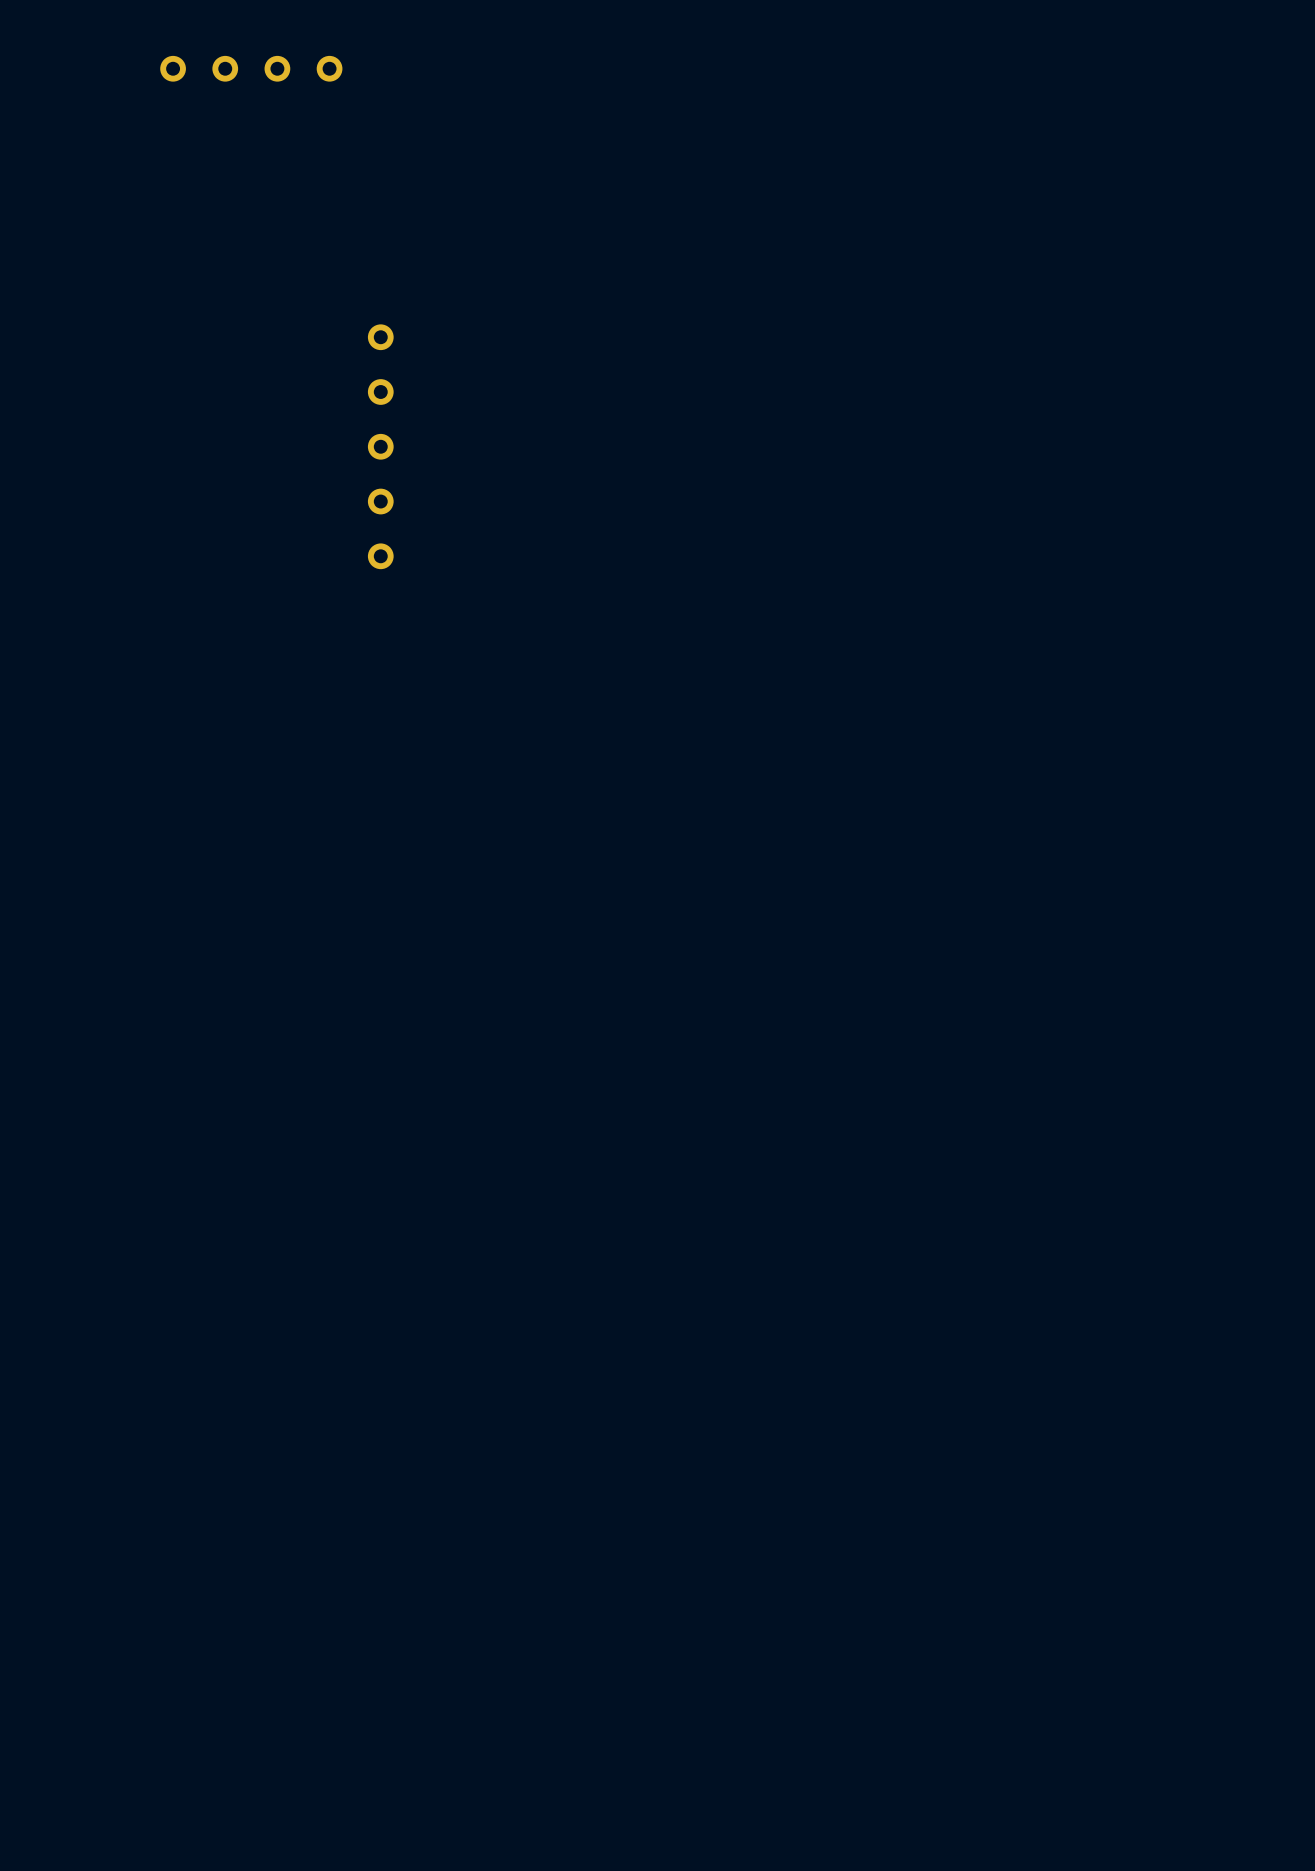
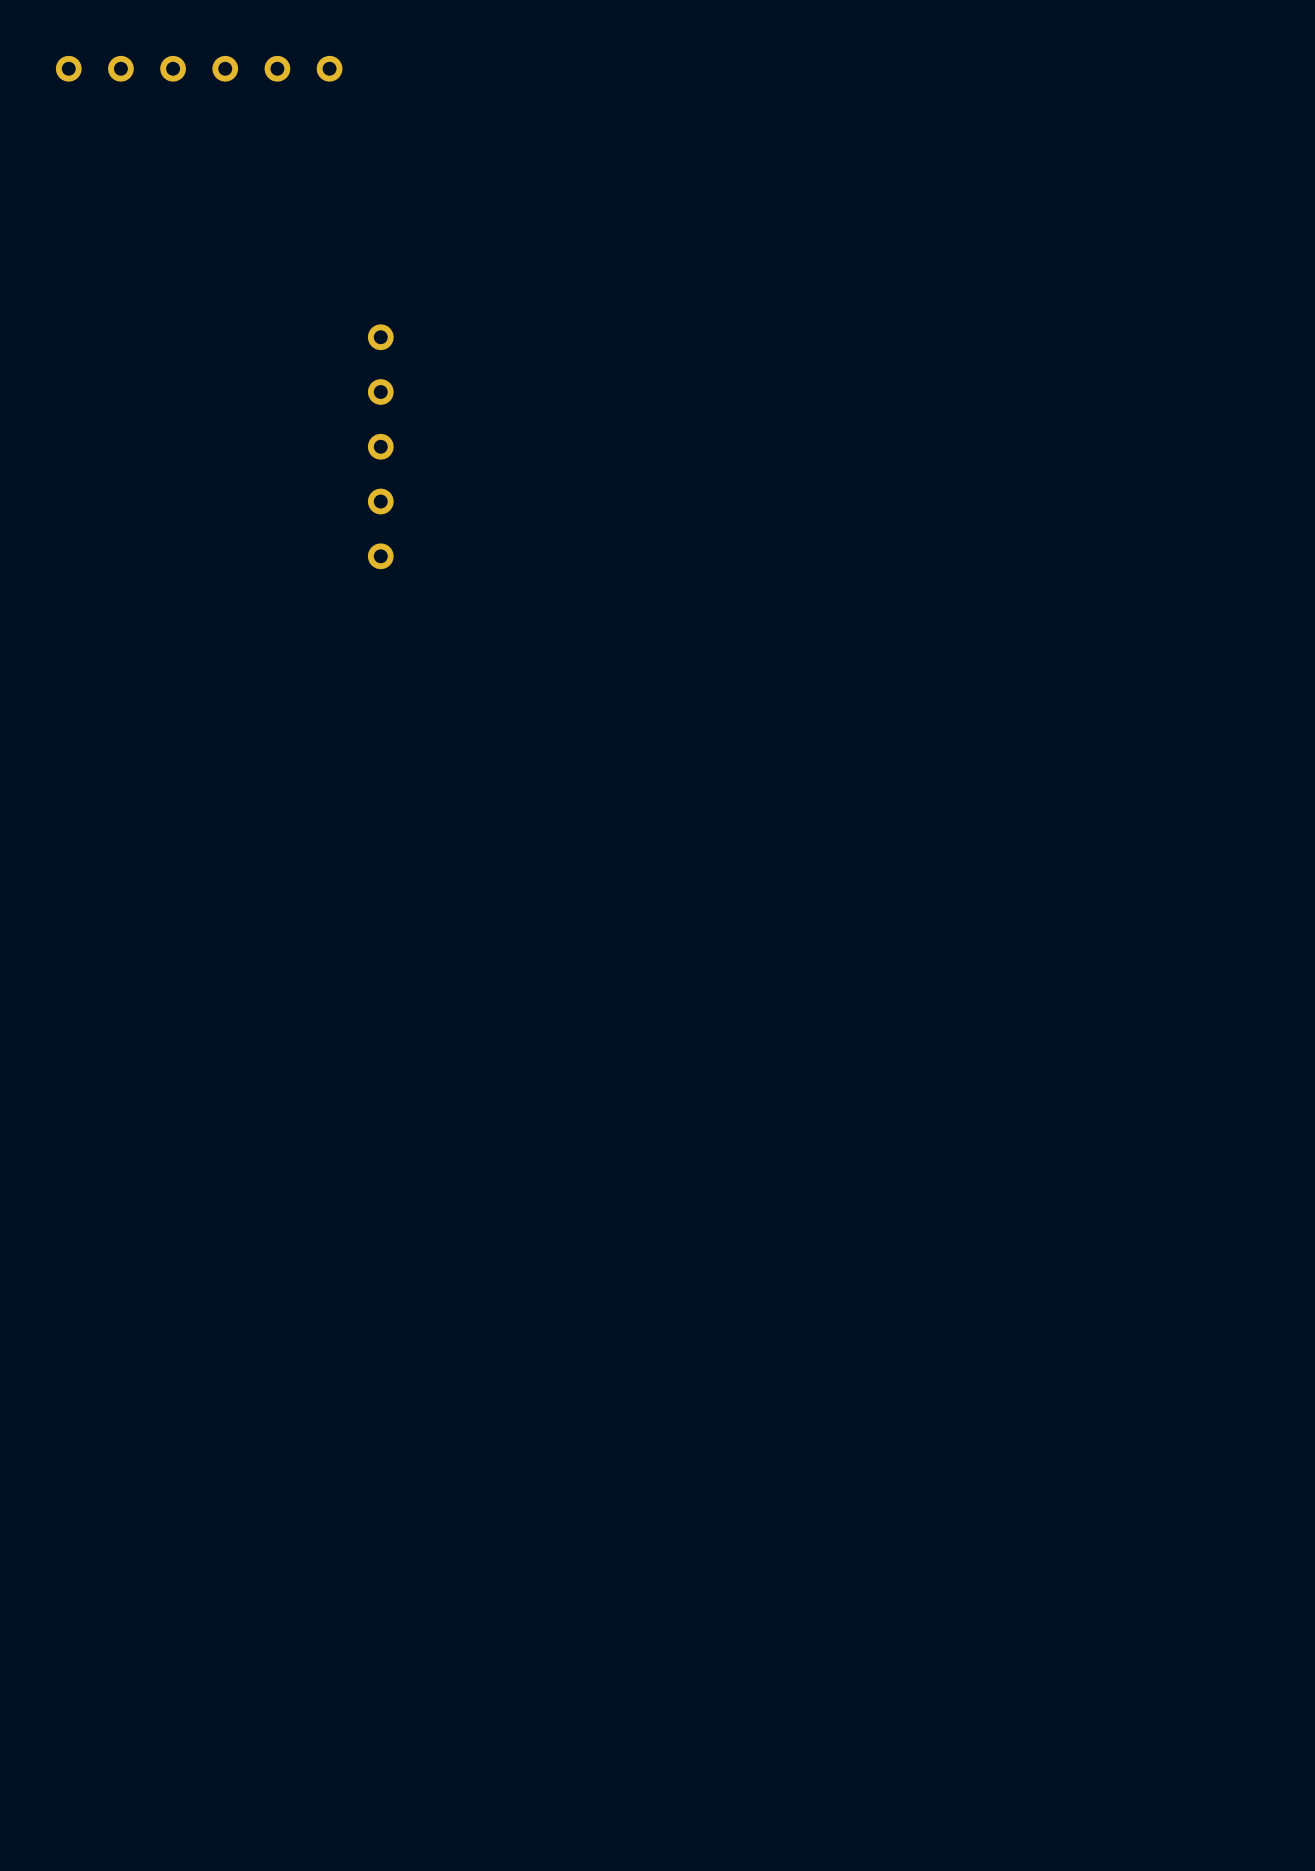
part: none -> (68, 68)
part: none -> (120, 68)

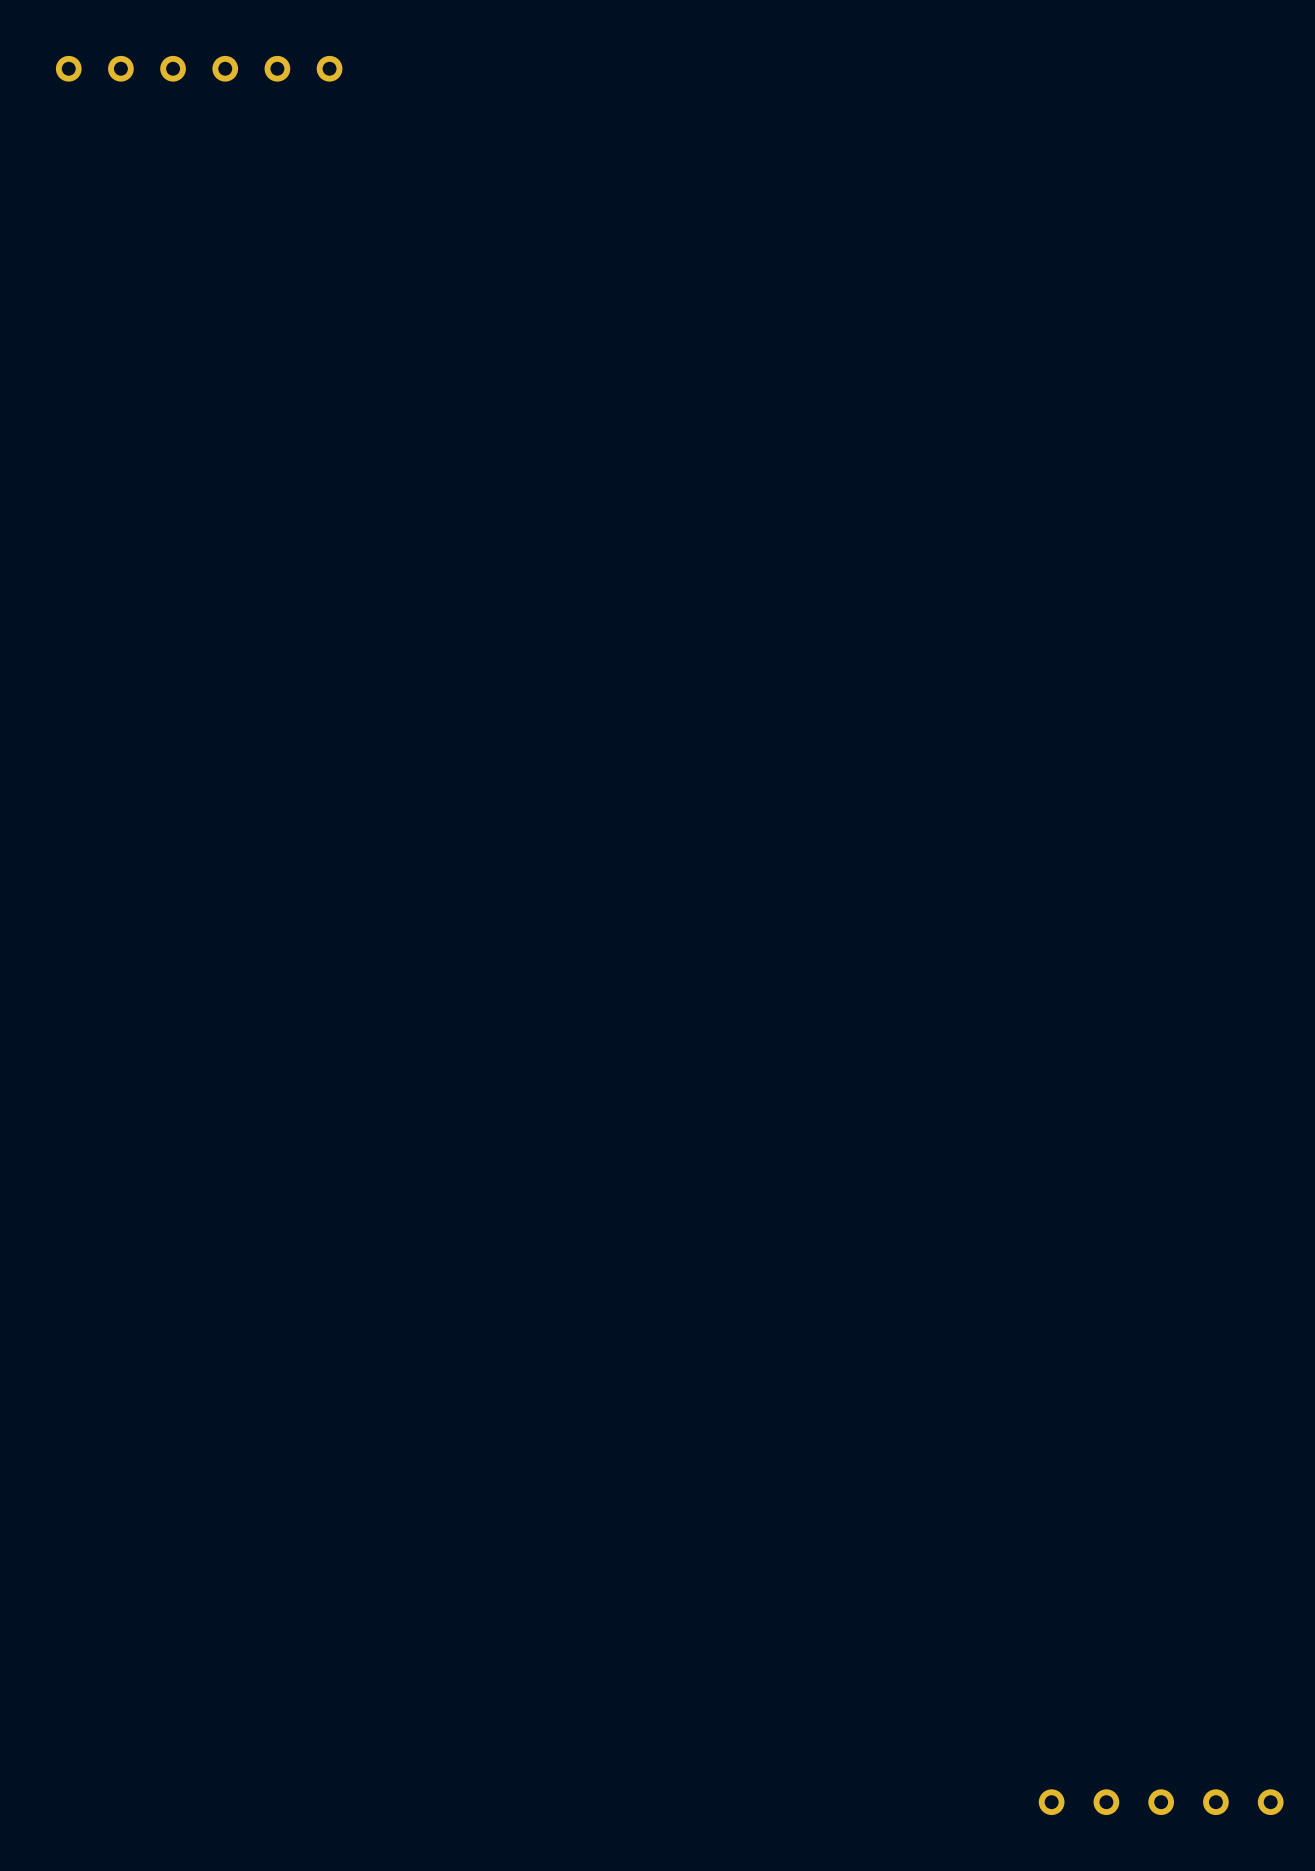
part: (380, 337) -> none
part: (380, 392) -> none
part: (380, 446) -> none
part: (380, 501) -> none
part: (380, 556) -> none
part: none -> (1051, 1802)
part: none -> (1106, 1802)
part: none -> (1161, 1802)
part: none -> (1215, 1802)
part: none -> (1270, 1802)

